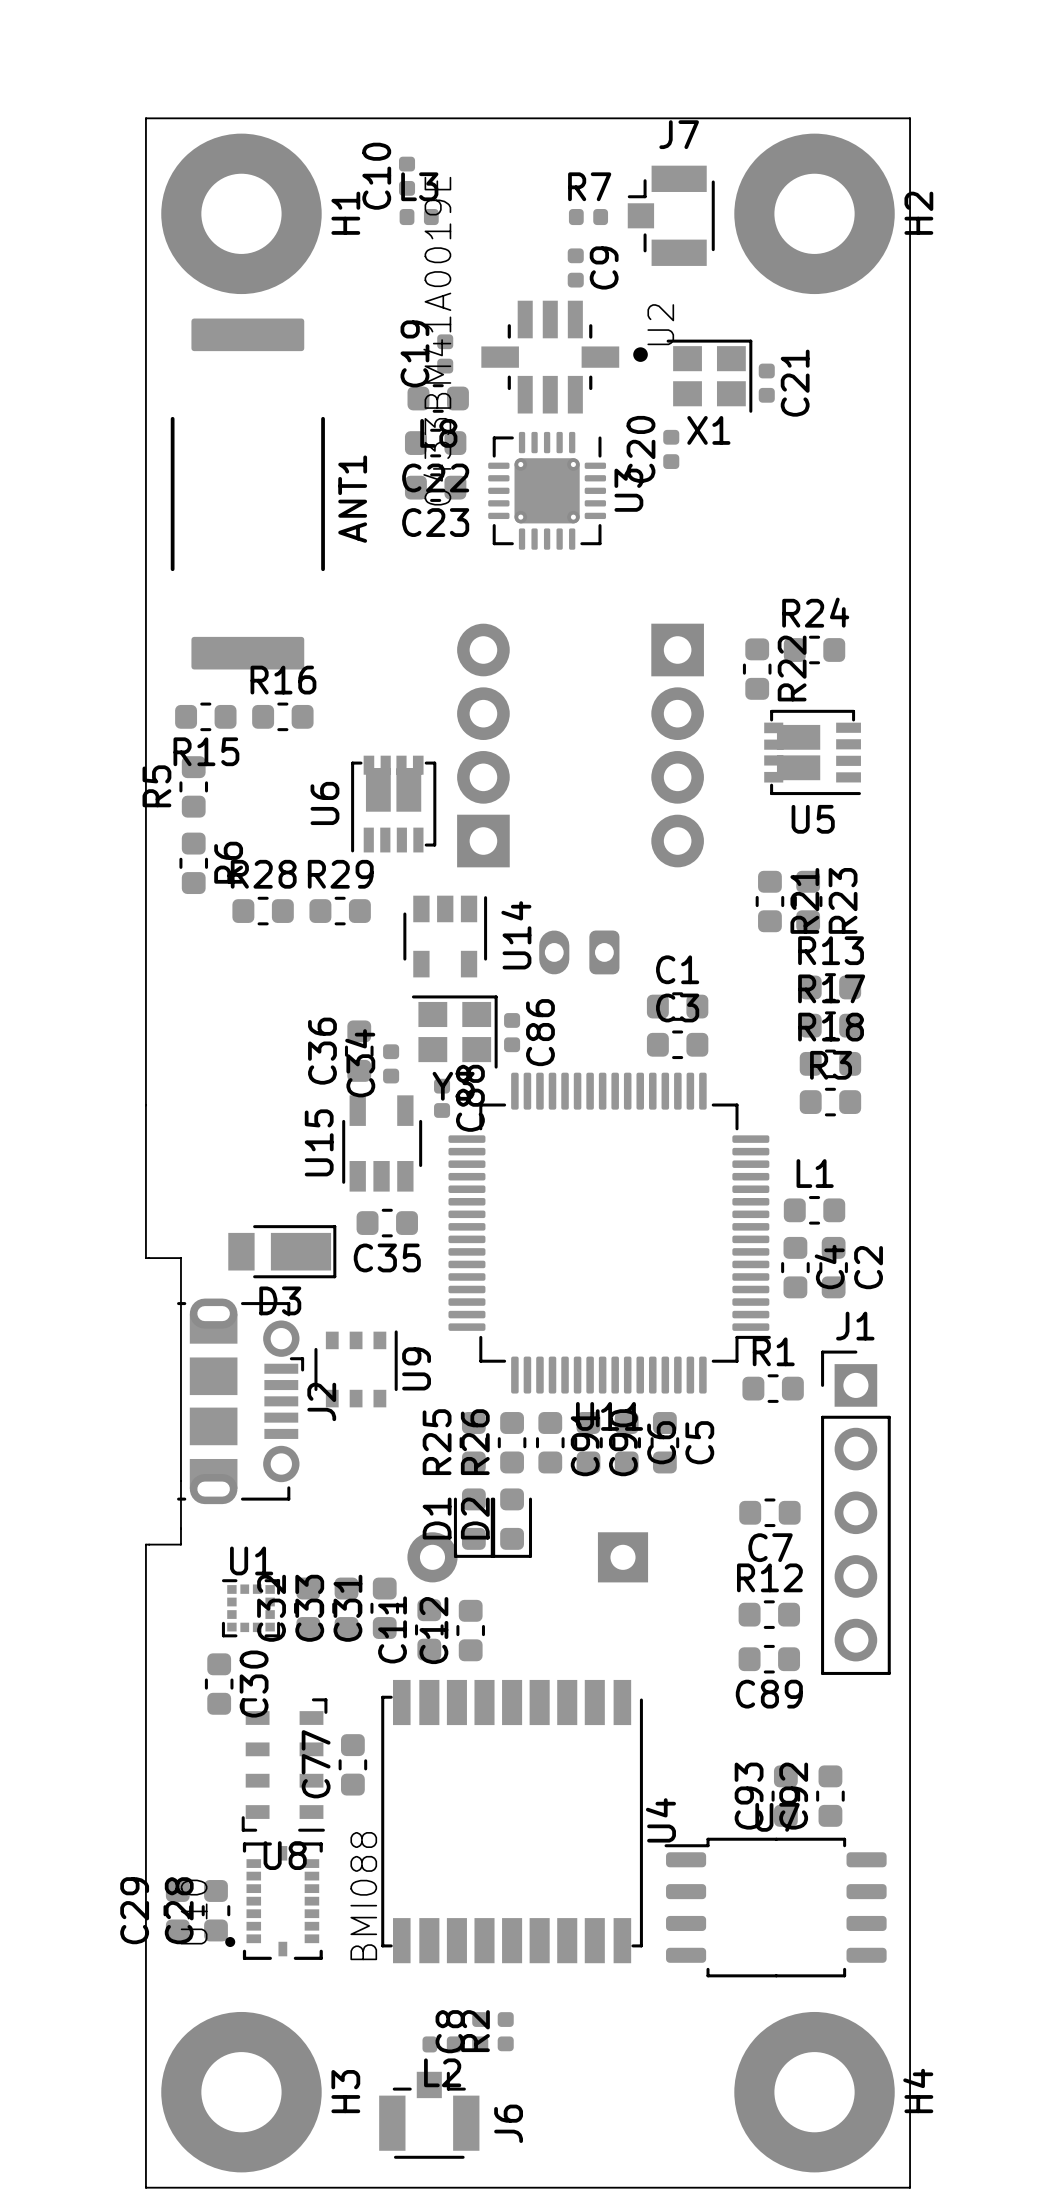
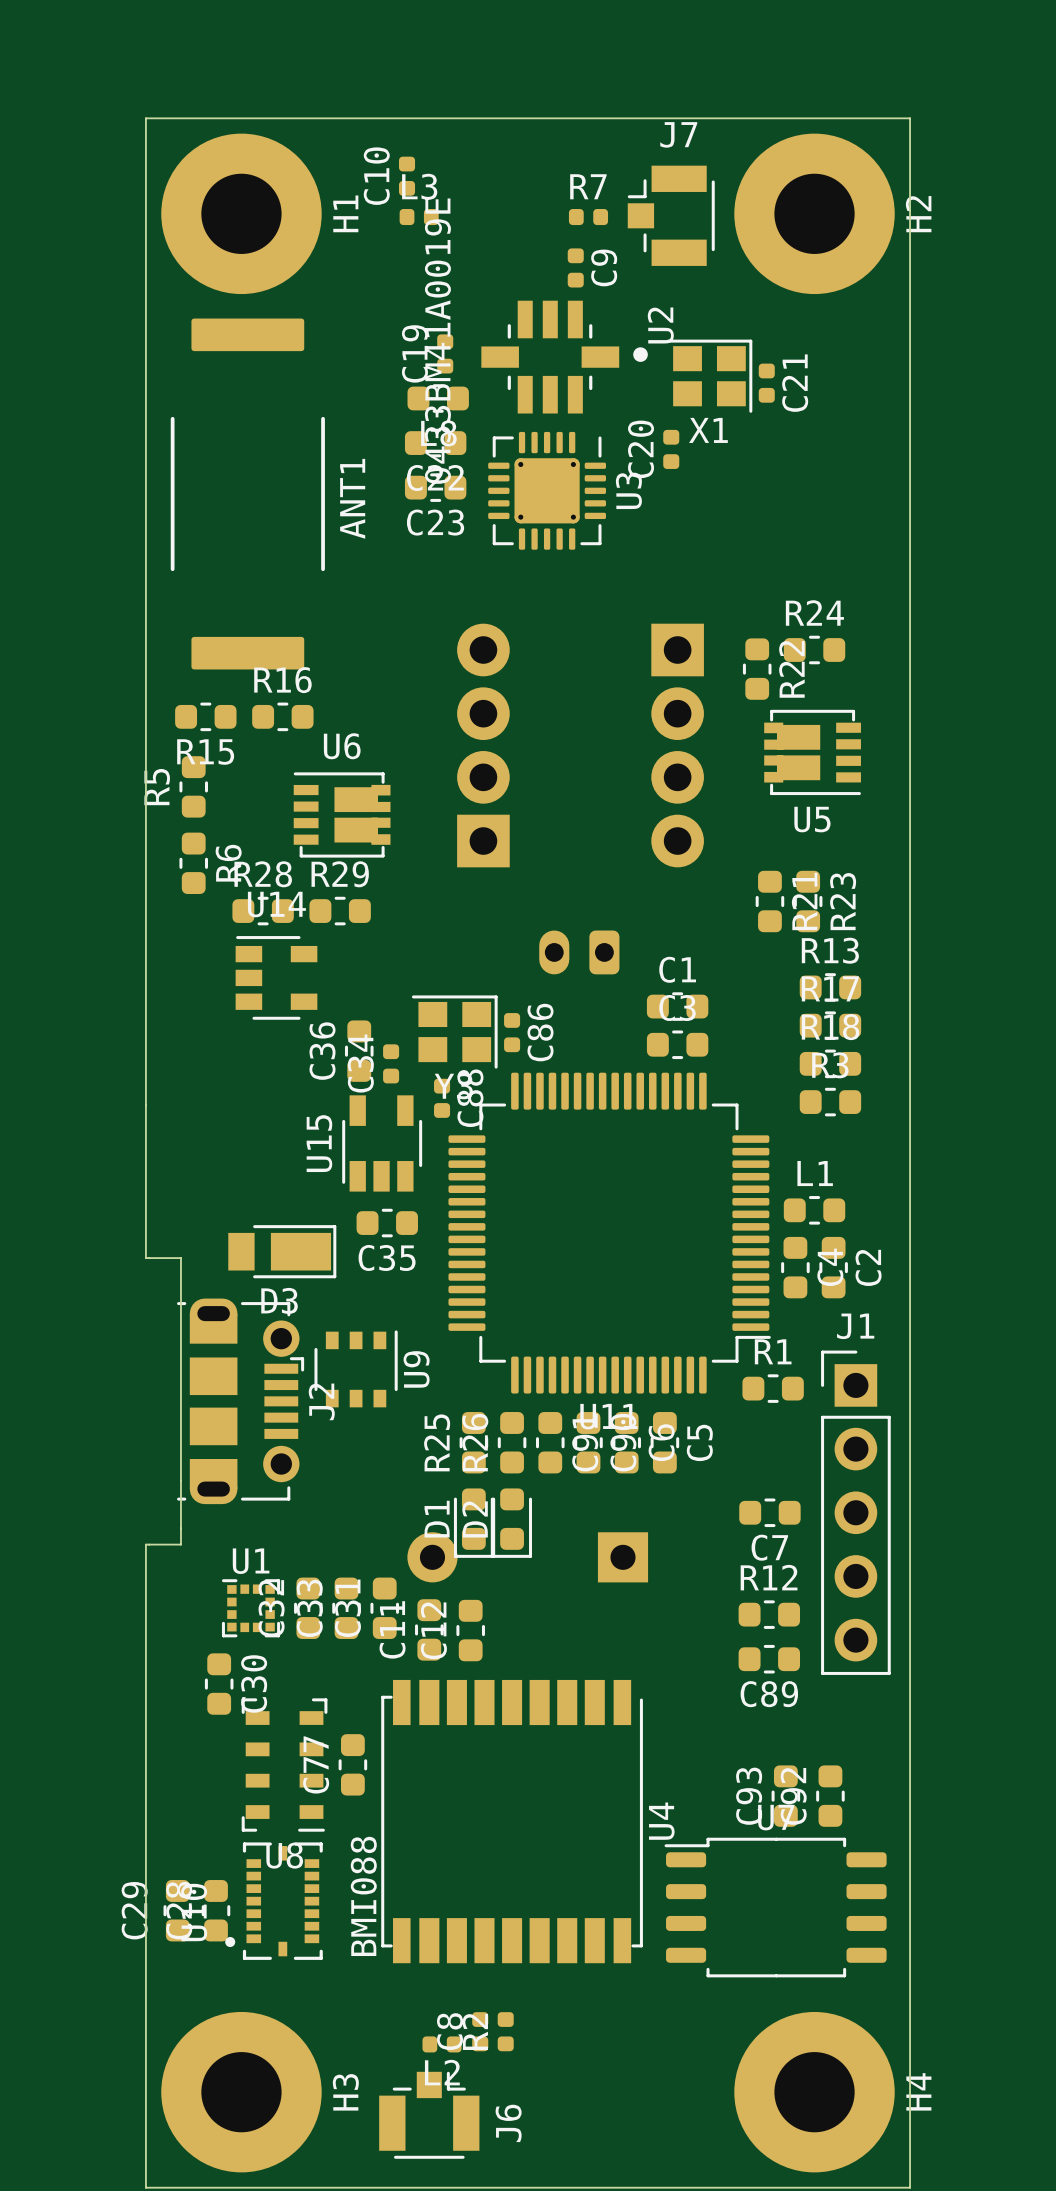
U6 rotation: 0° (393, 804) -> 90° clockwise (342, 814)
U14 rotation: 0° (445, 936) -> 90° counterclockwise (276, 977)
U14 position: (445, 936) -> (276, 977)

